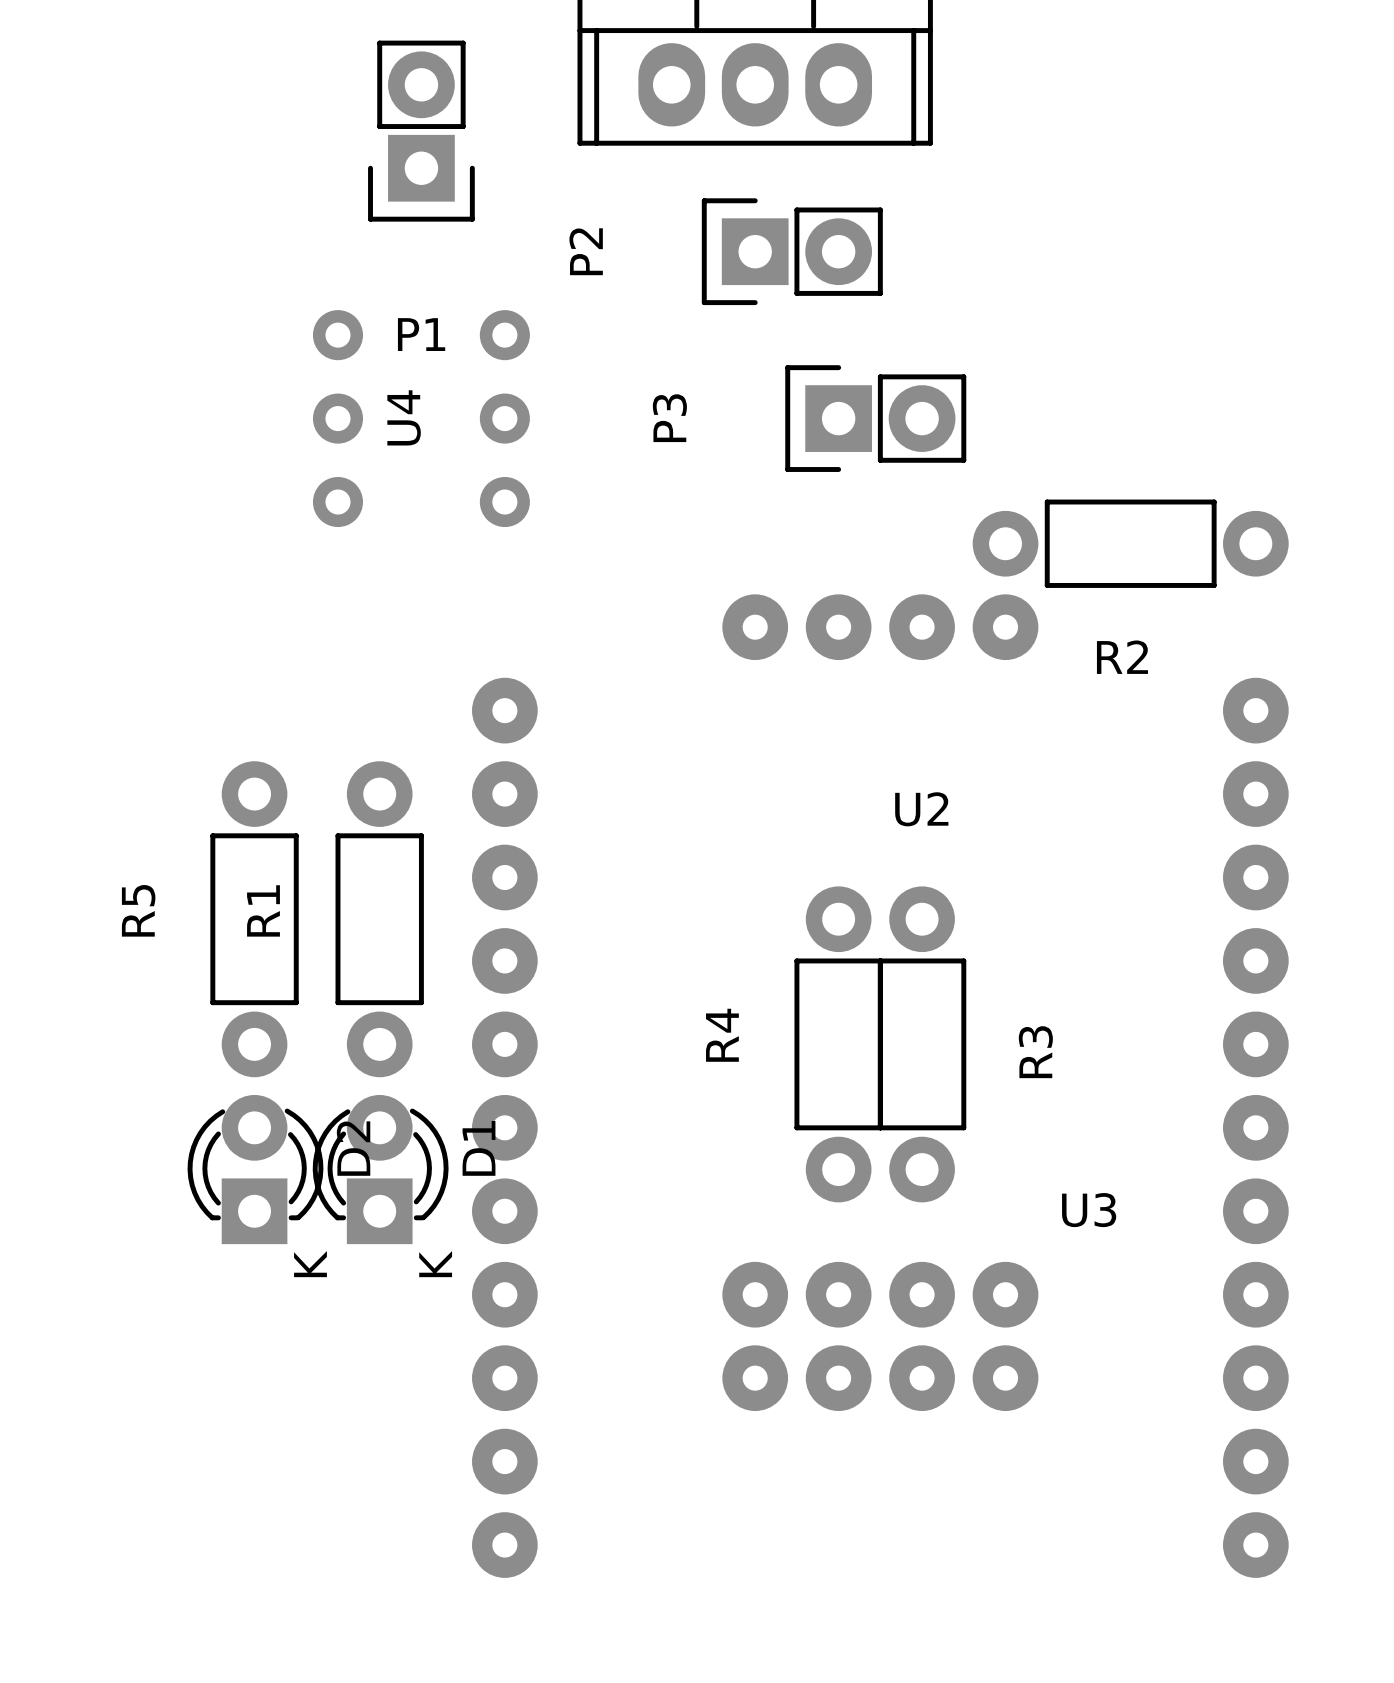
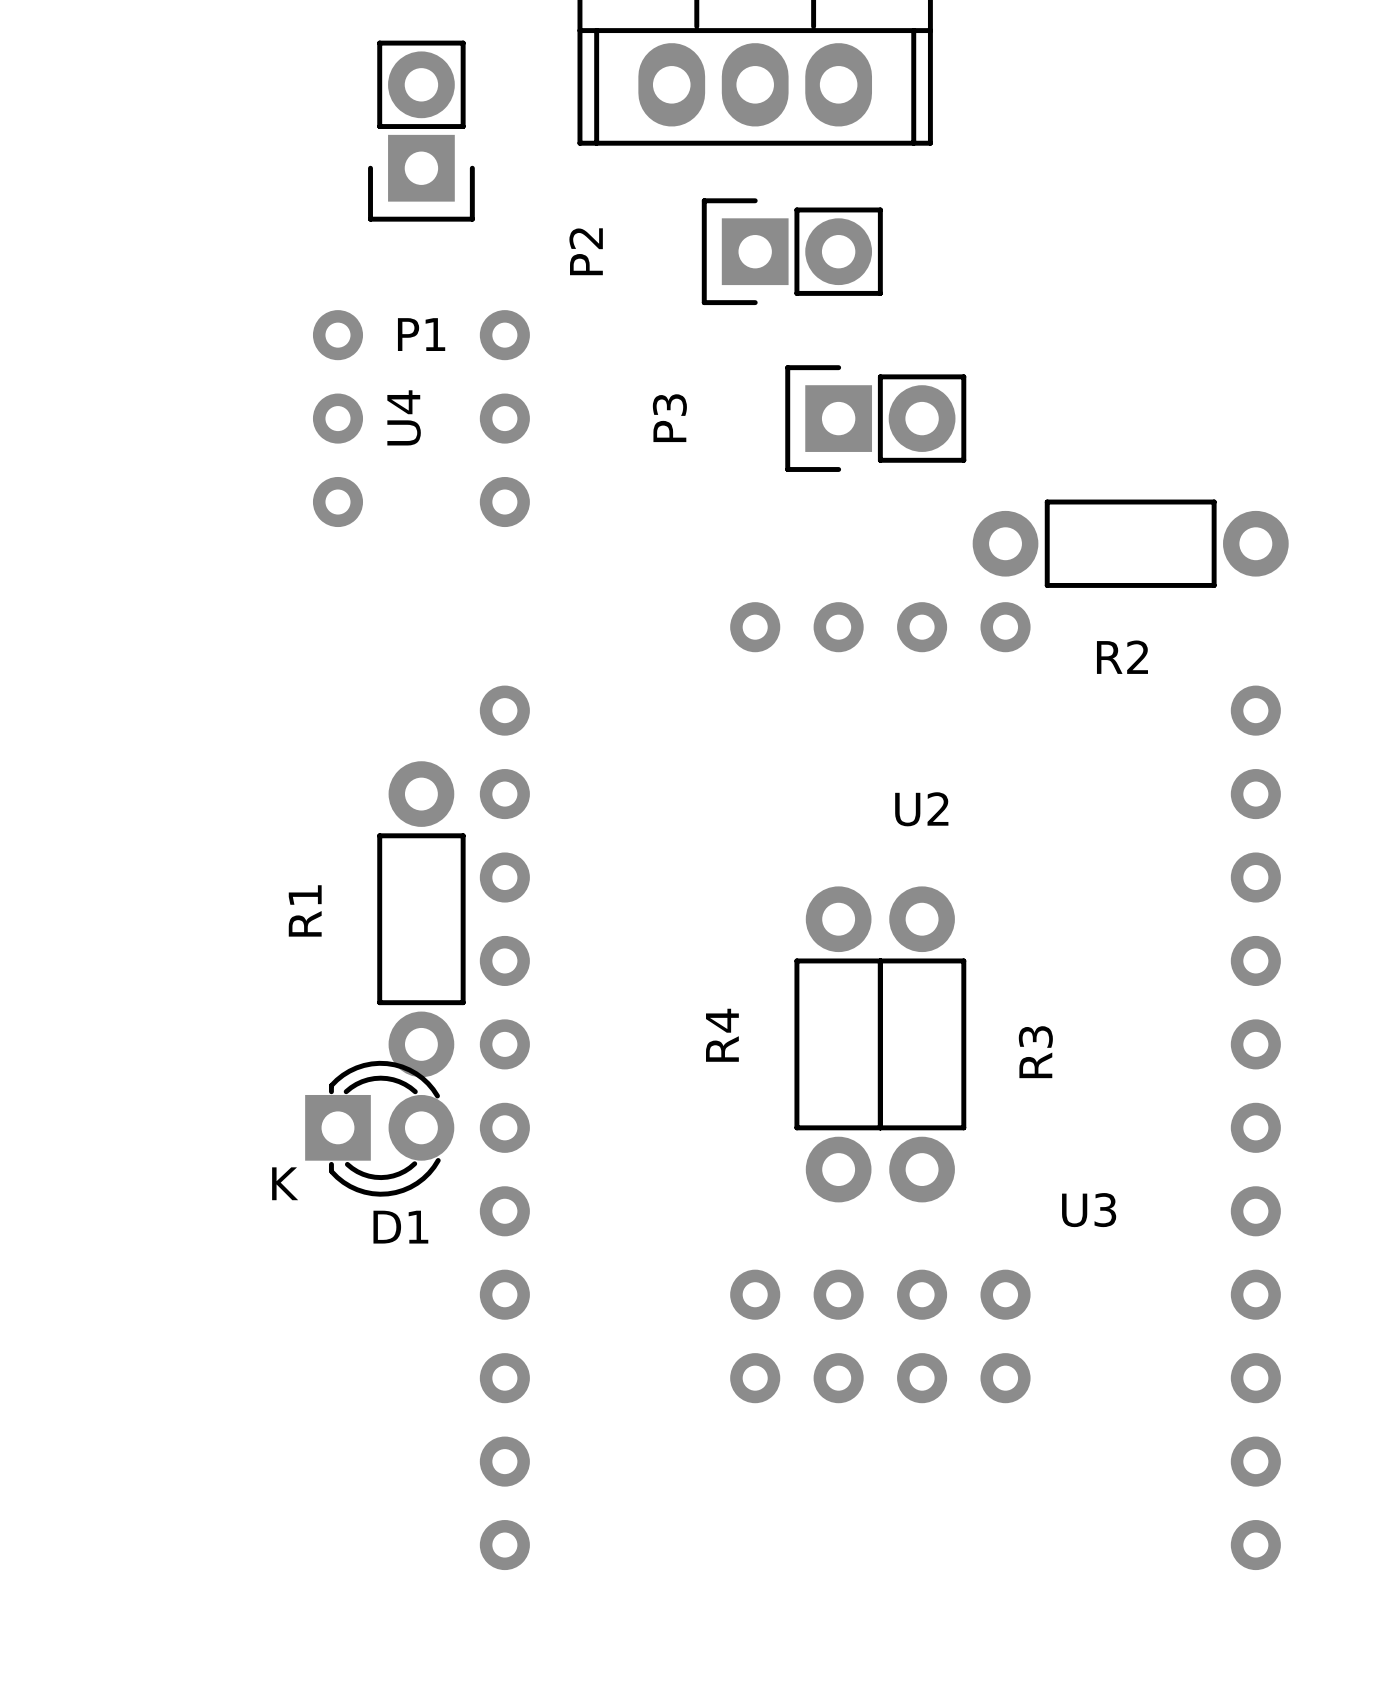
U2 footprint: [472, 594, 1289, 1578] -> [479, 602, 1281, 1571]
R5: (254, 919) -> none
R1 position: (379, 919) -> (421, 919)
D2: (255, 1169) -> none
D1 rotation: 0° (380, 1169) -> 90° clockwise (379, 1128)
U3 footprint: [722, 1261, 1039, 1412] -> [730, 1269, 1031, 1404]

